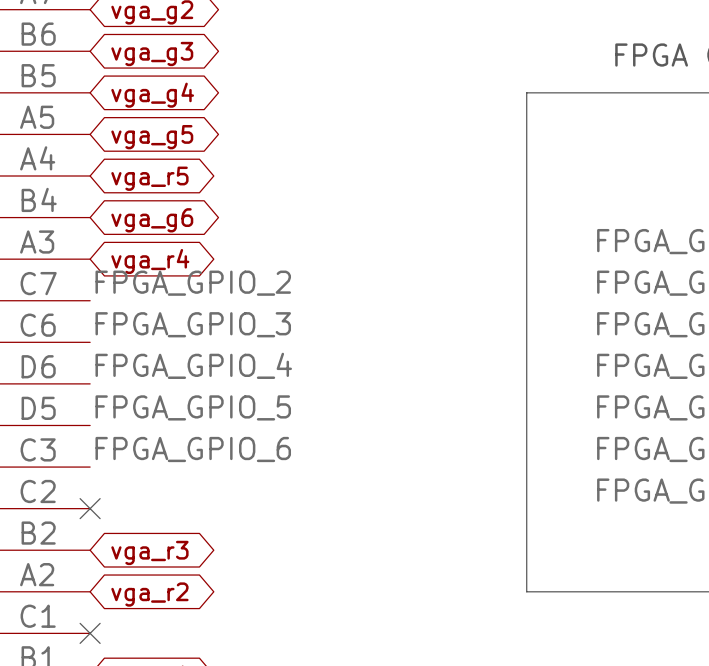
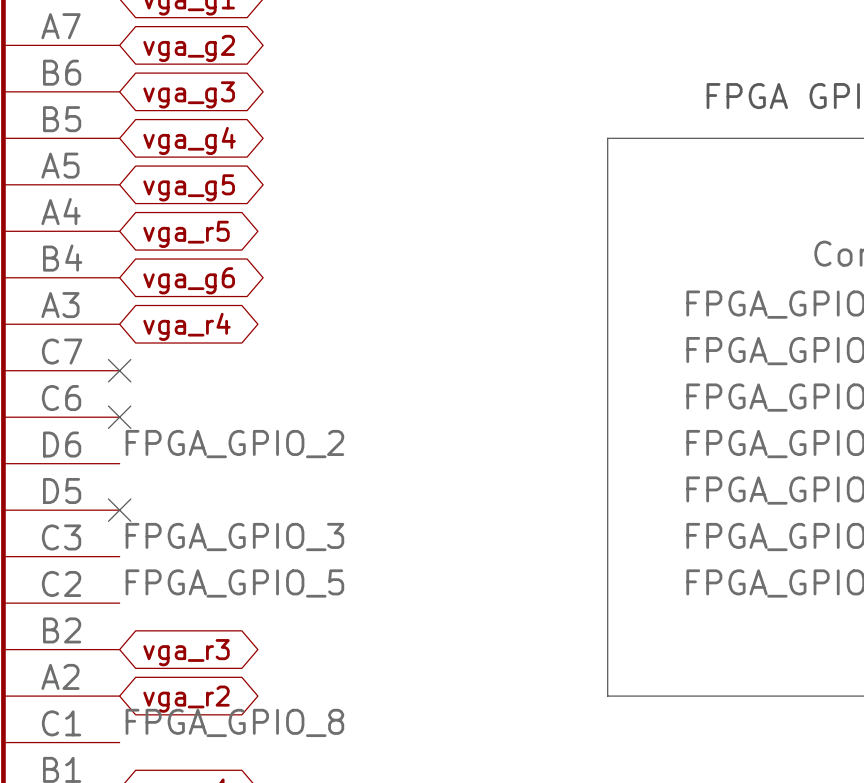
label: FPGA_GPIO_2 (193, 283) -> none
no-connect mark: none -> (119, 370)
label: FPGA_GPIO_3 (193, 324) -> none
no-connect mark: none -> (119, 417)
label: FPGA_GPIO_4 (193, 365) -> FPGA_GPIO_2 (234, 444)
label position: FPGA_GPIO_5 (193, 407) -> FPGA_GPIO_5 (234, 583)
no-connect mark: none -> (119, 510)
label: FPGA_GPIO_6 (193, 449) -> FPGA_GPIO_3 (234, 537)
no-connect mark: (90, 508) -> none
label: none -> FPGA_GPIO_8 (234, 722)
no-connect mark: (90, 633) -> none

